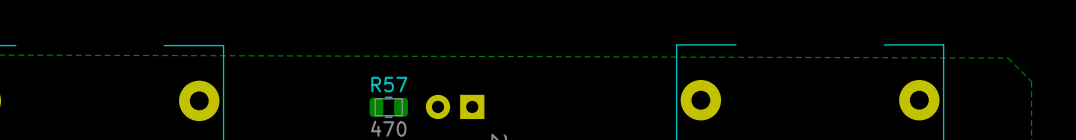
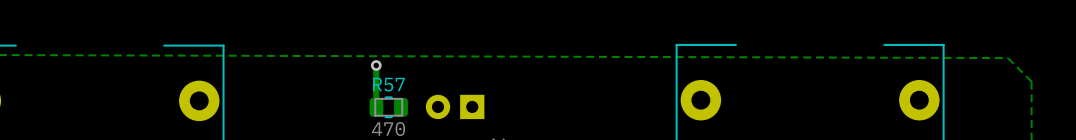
track: none -> (376, 65) (376, 107)
via: none -> (376, 65)

